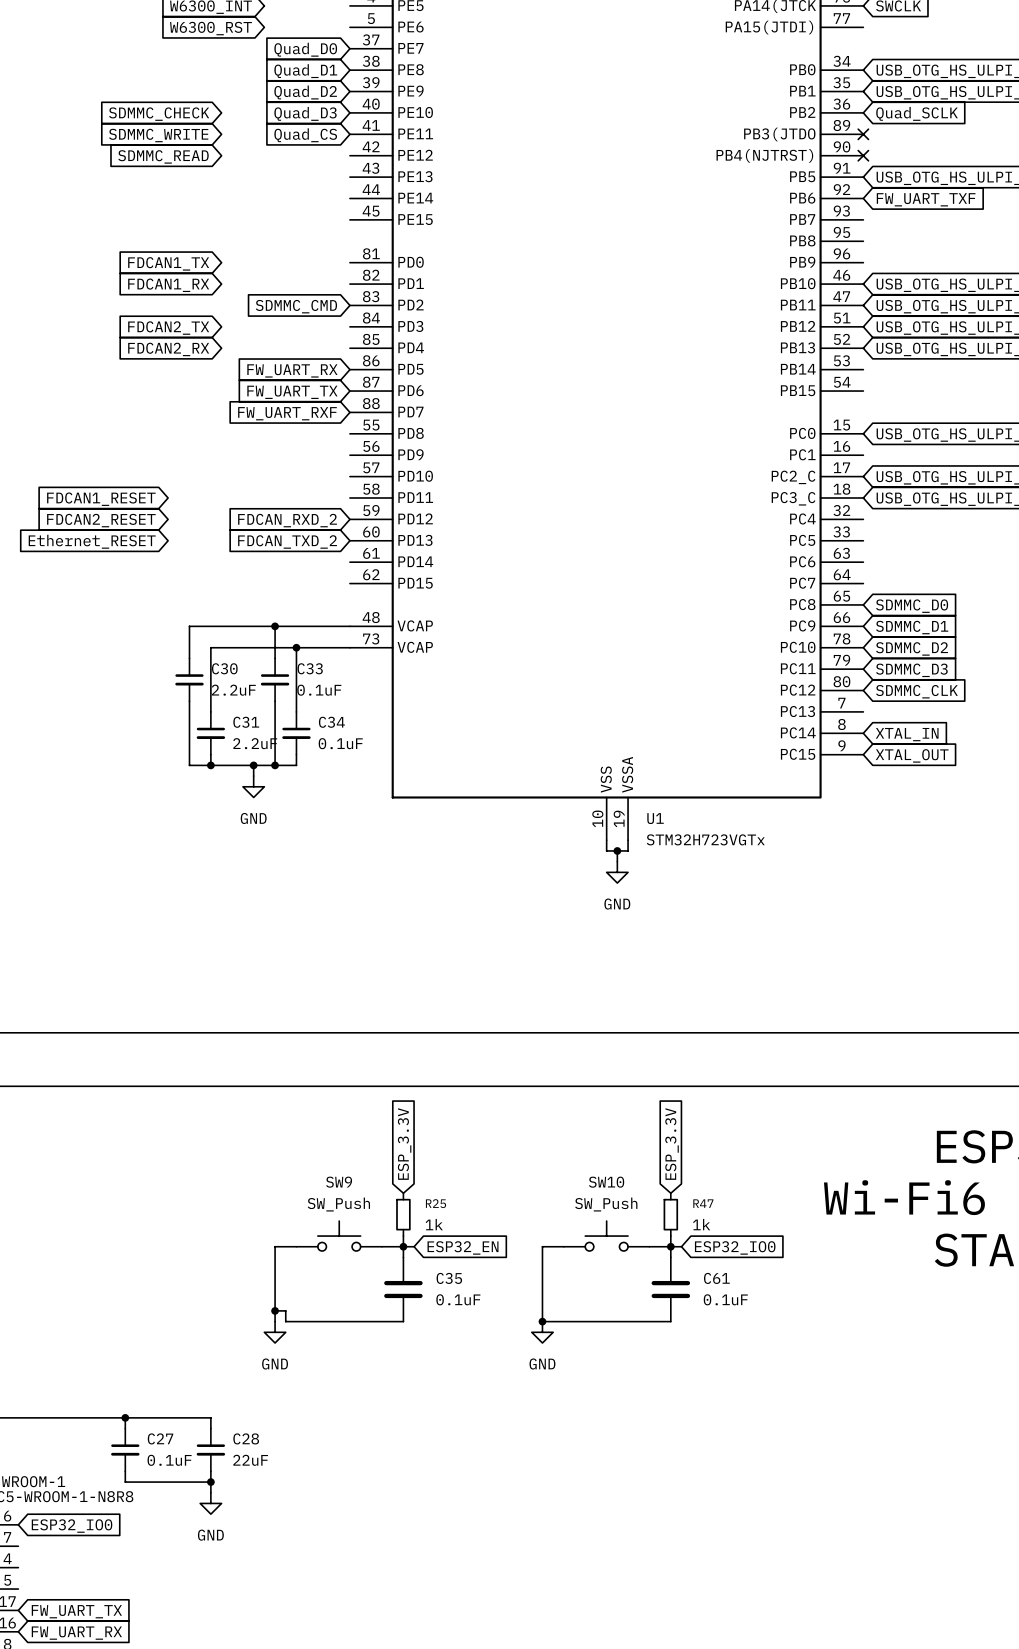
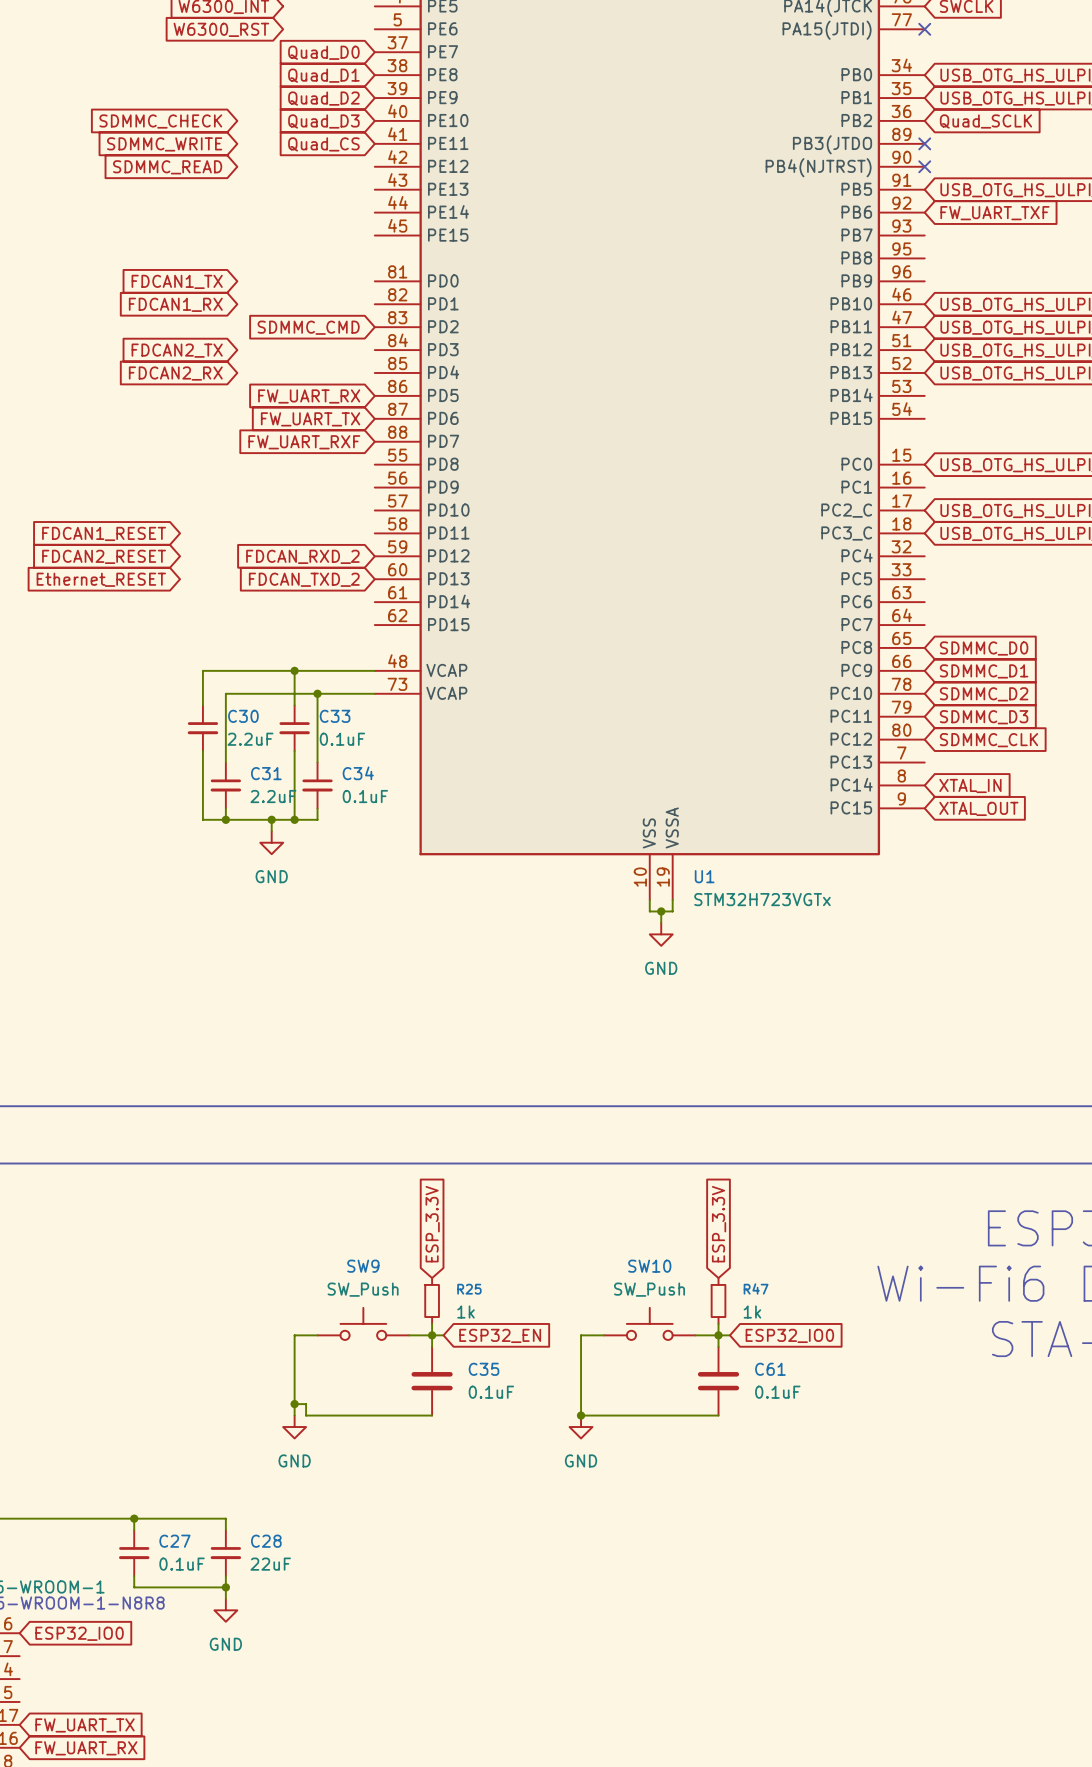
no-connect mark: none -> (924, 29)

